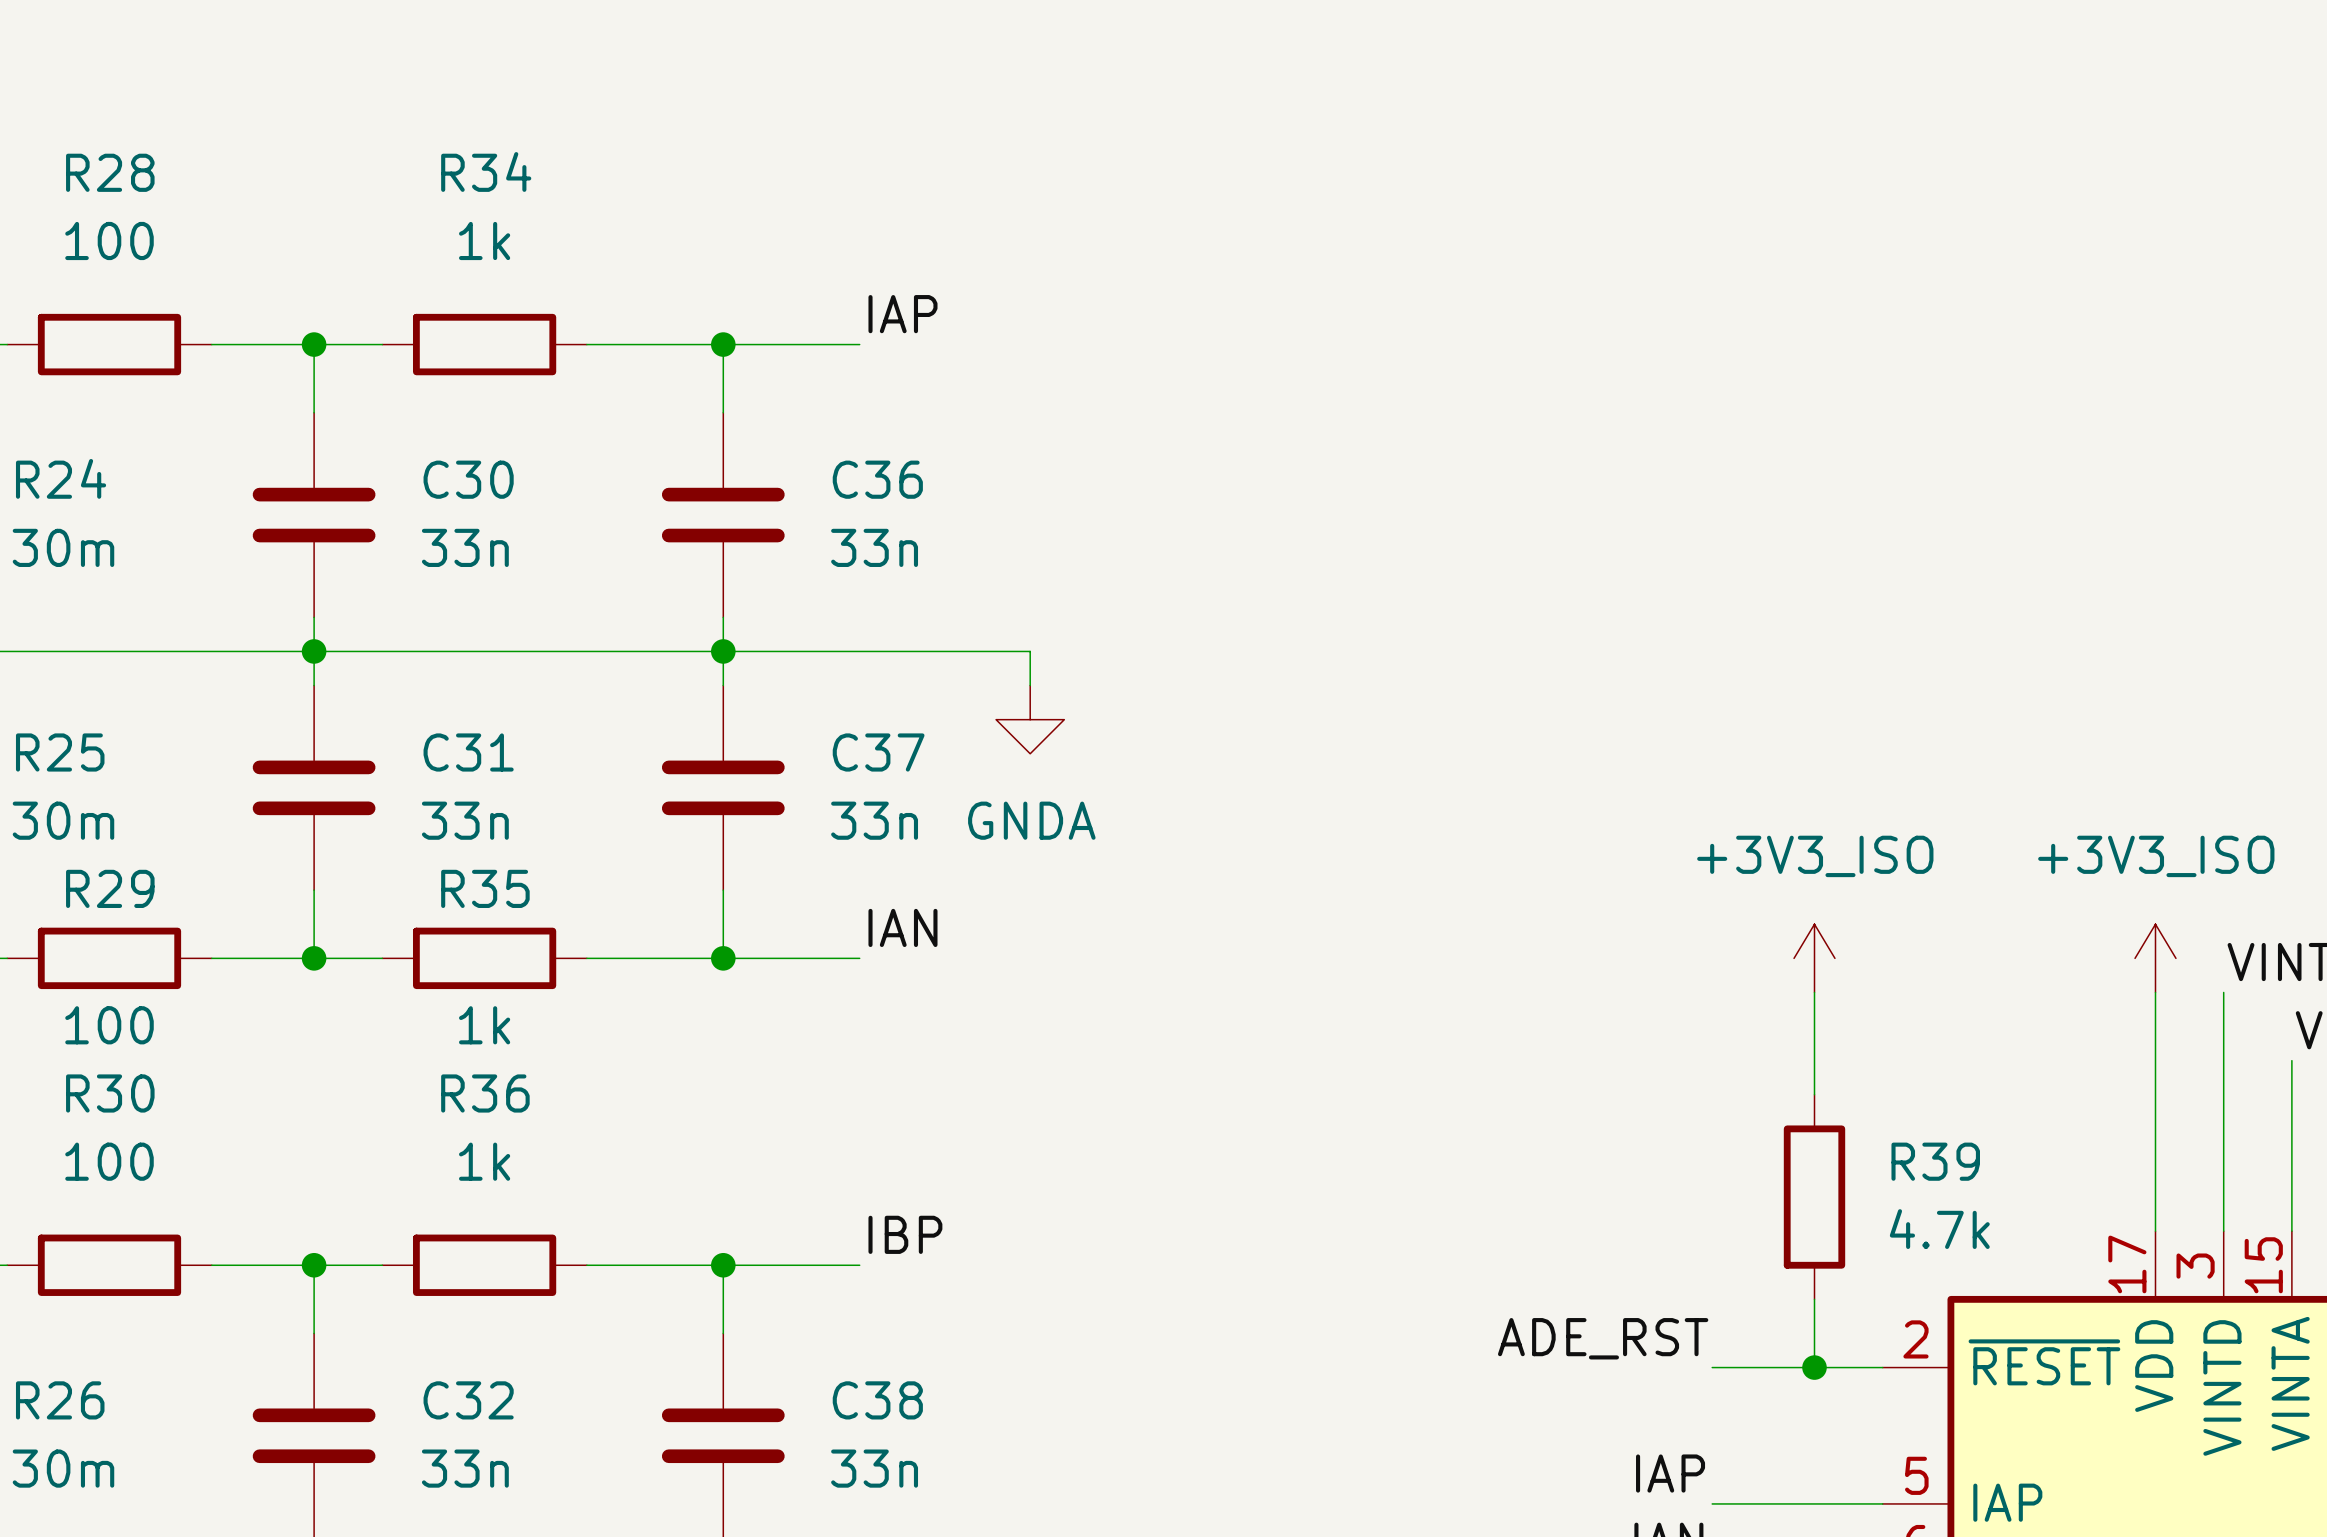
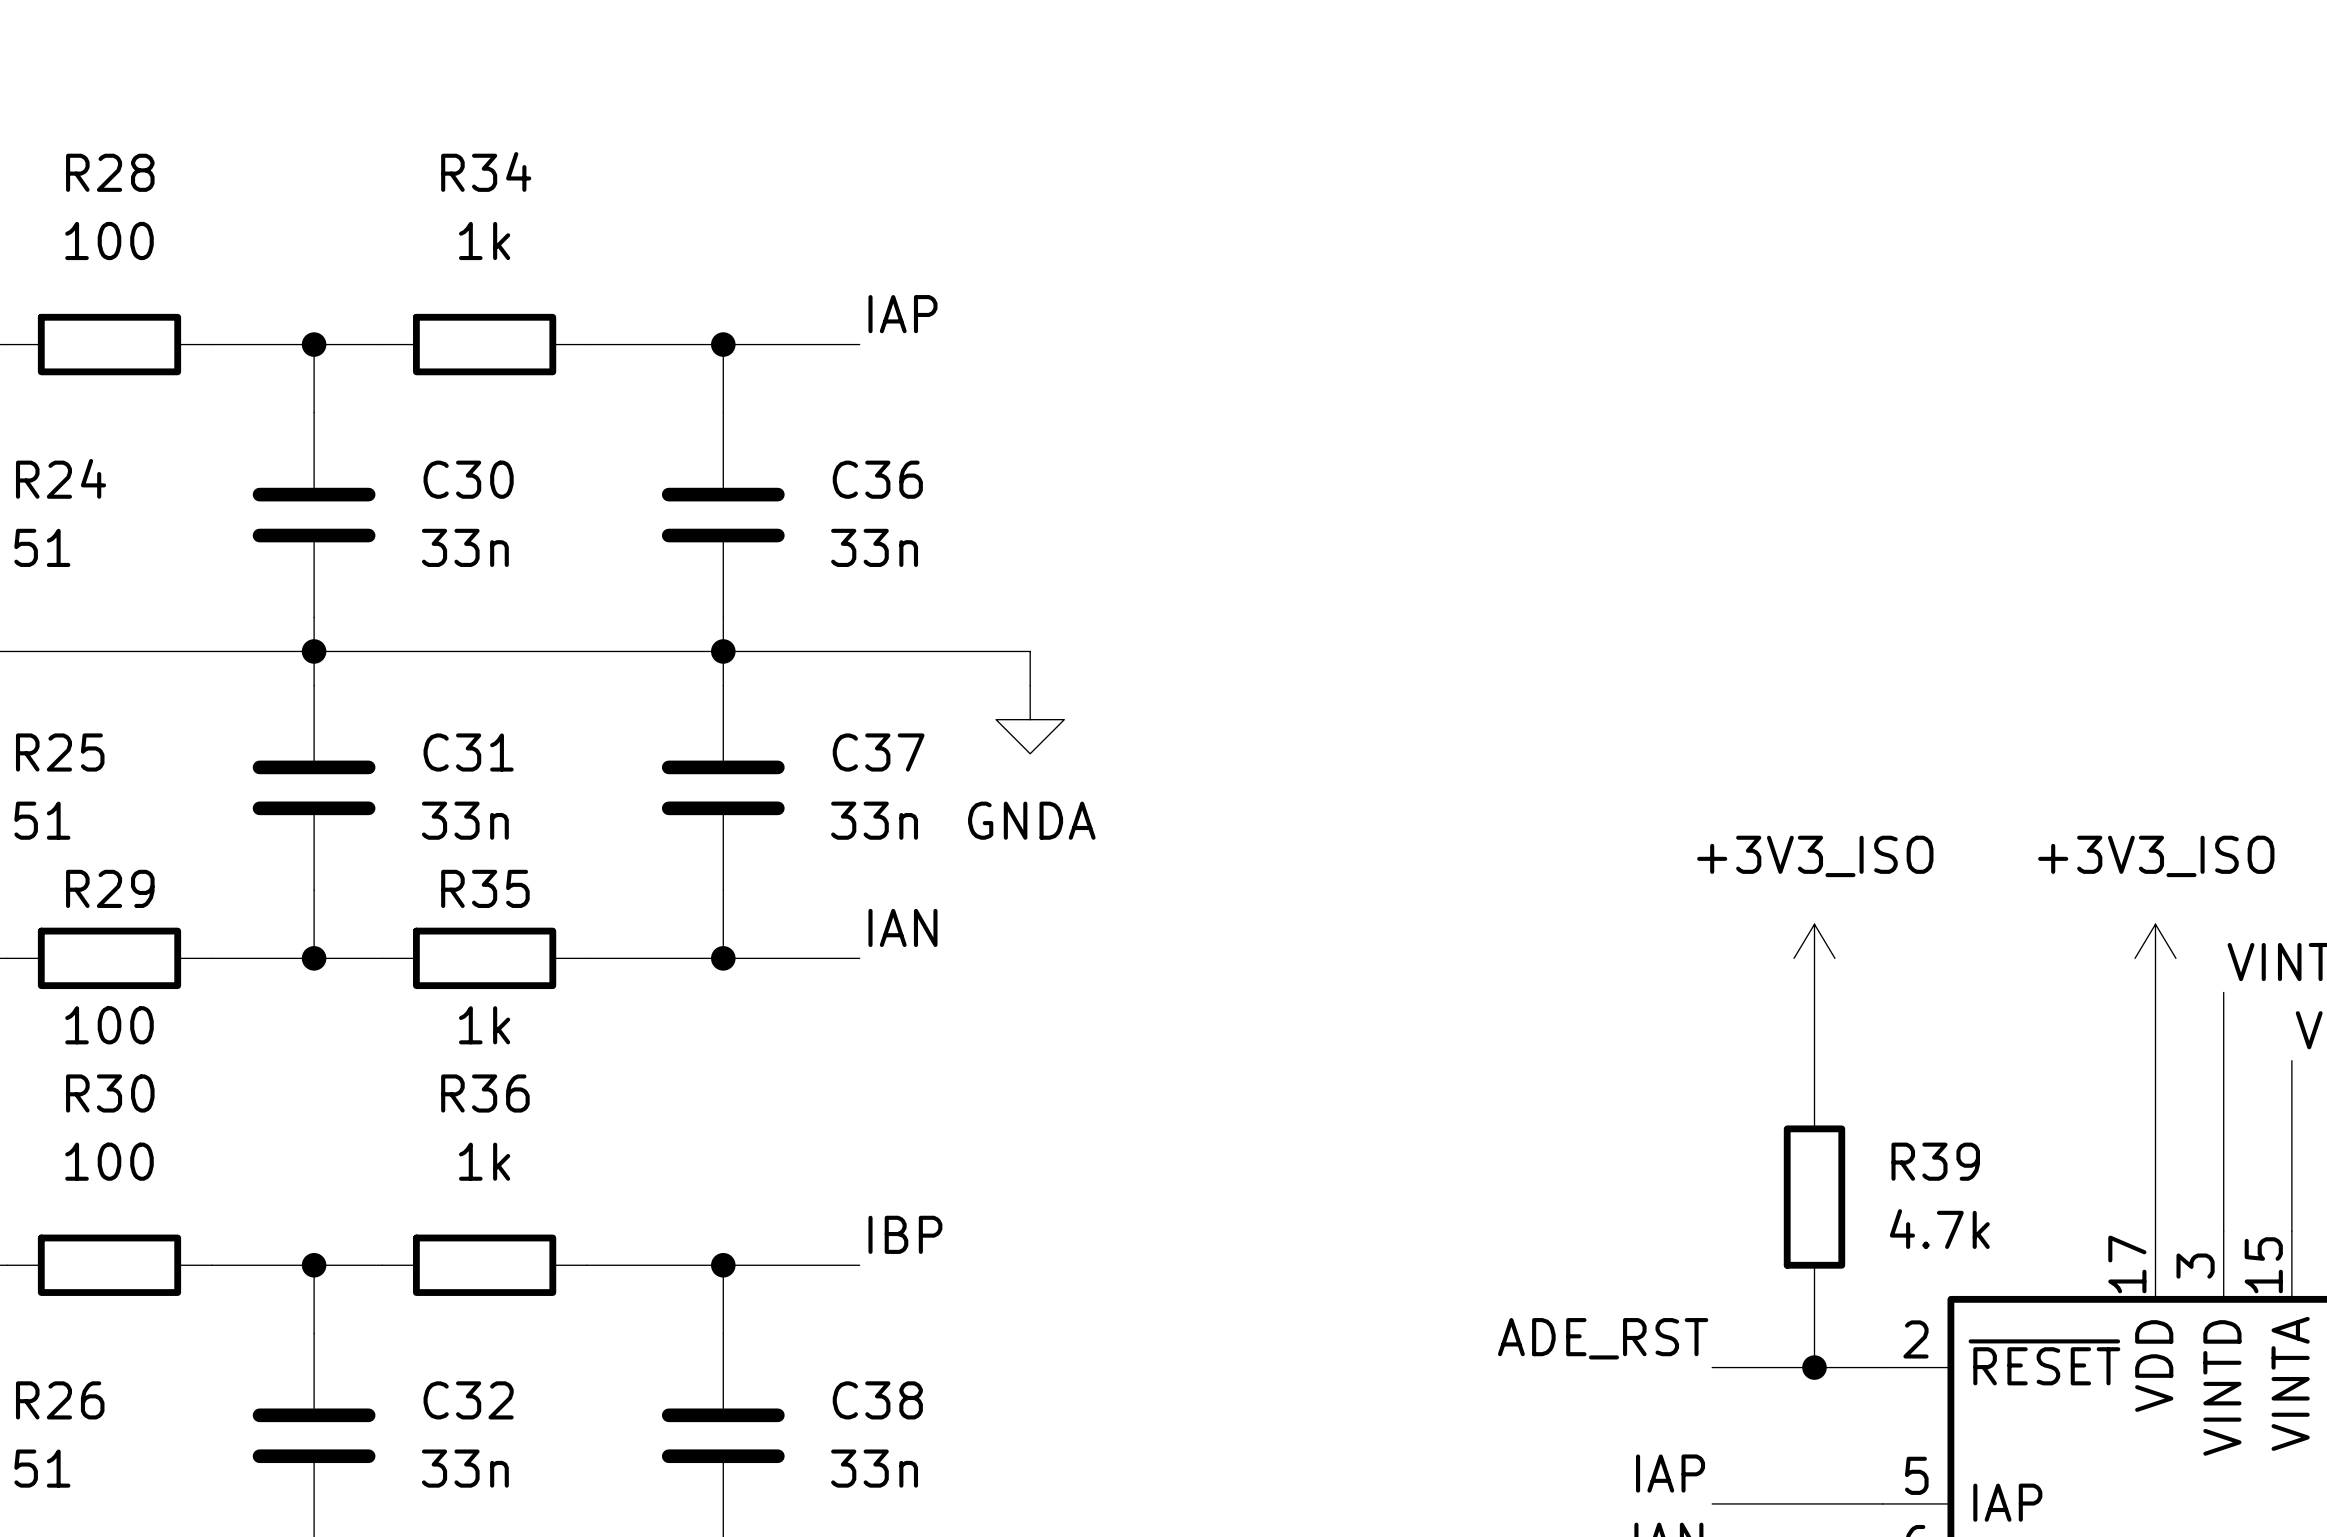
R24 value: 30m (63, 547) -> 51 (42, 547)
R25 value: 30m (63, 820) -> 51 (42, 820)
R26 value: 30m (63, 1468) -> 51 (42, 1468)

